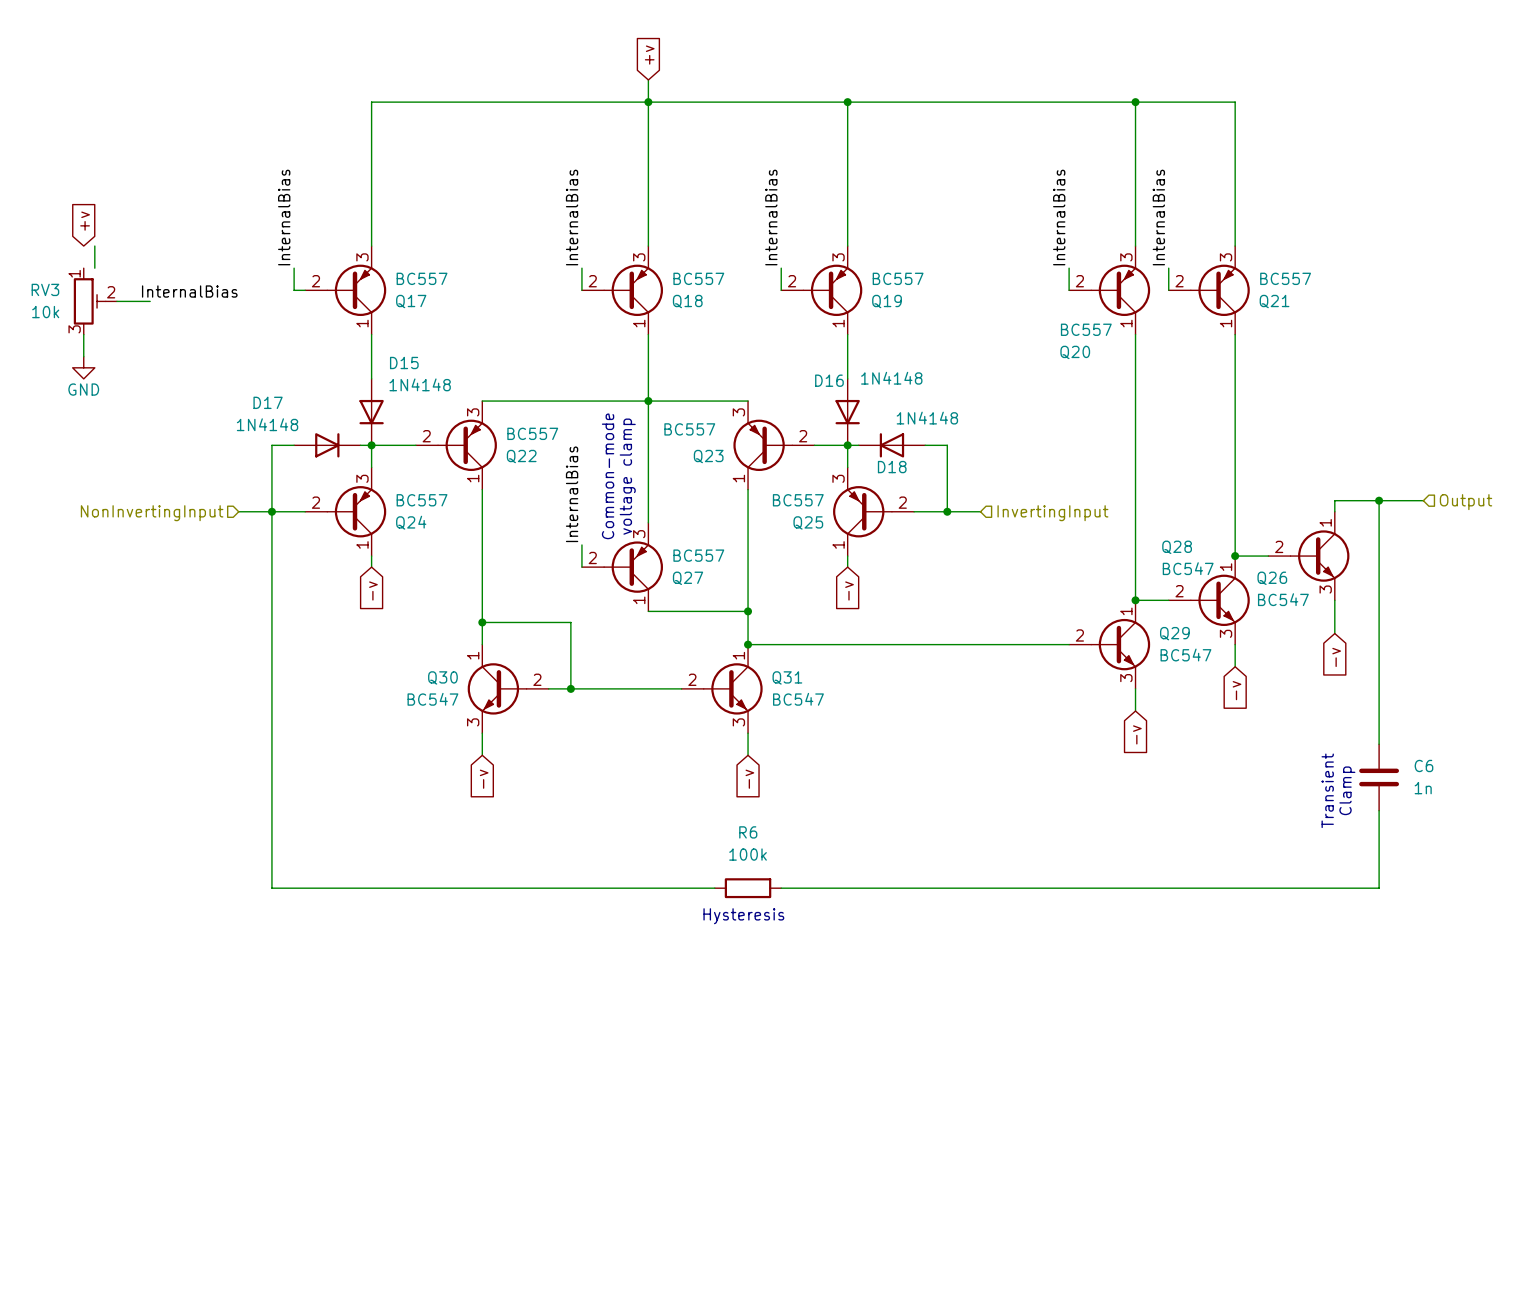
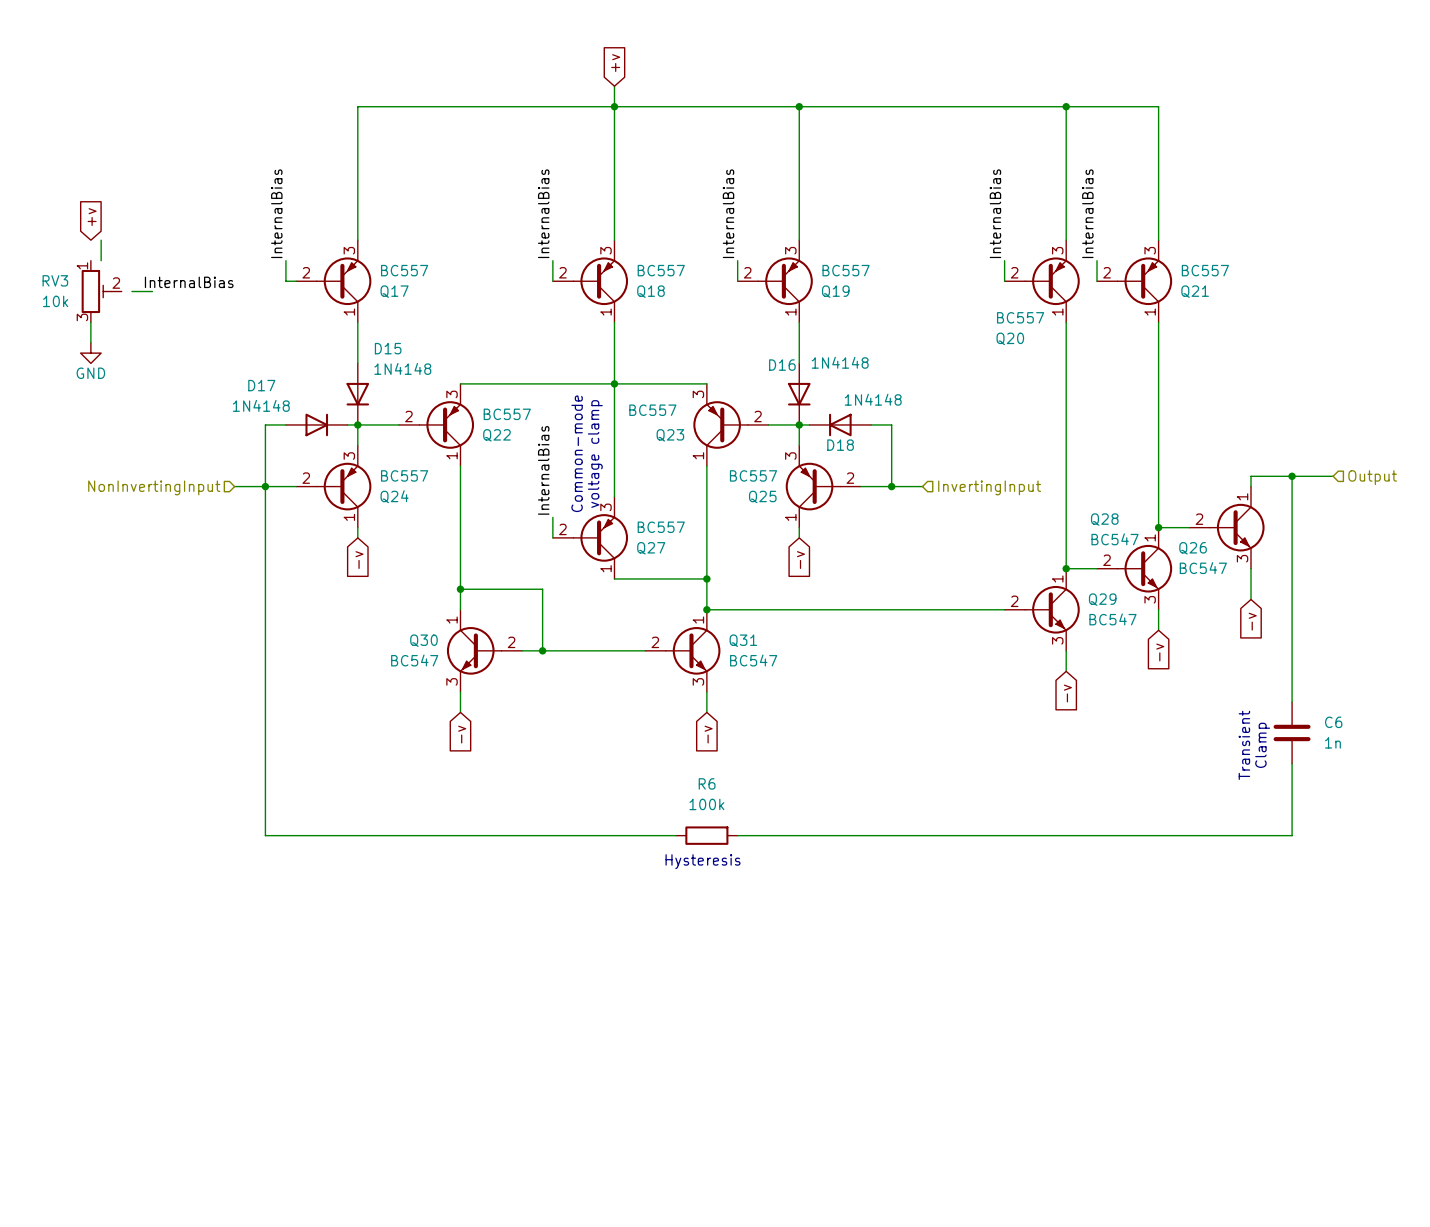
wire: (116, 301) (128, 301) -> none

